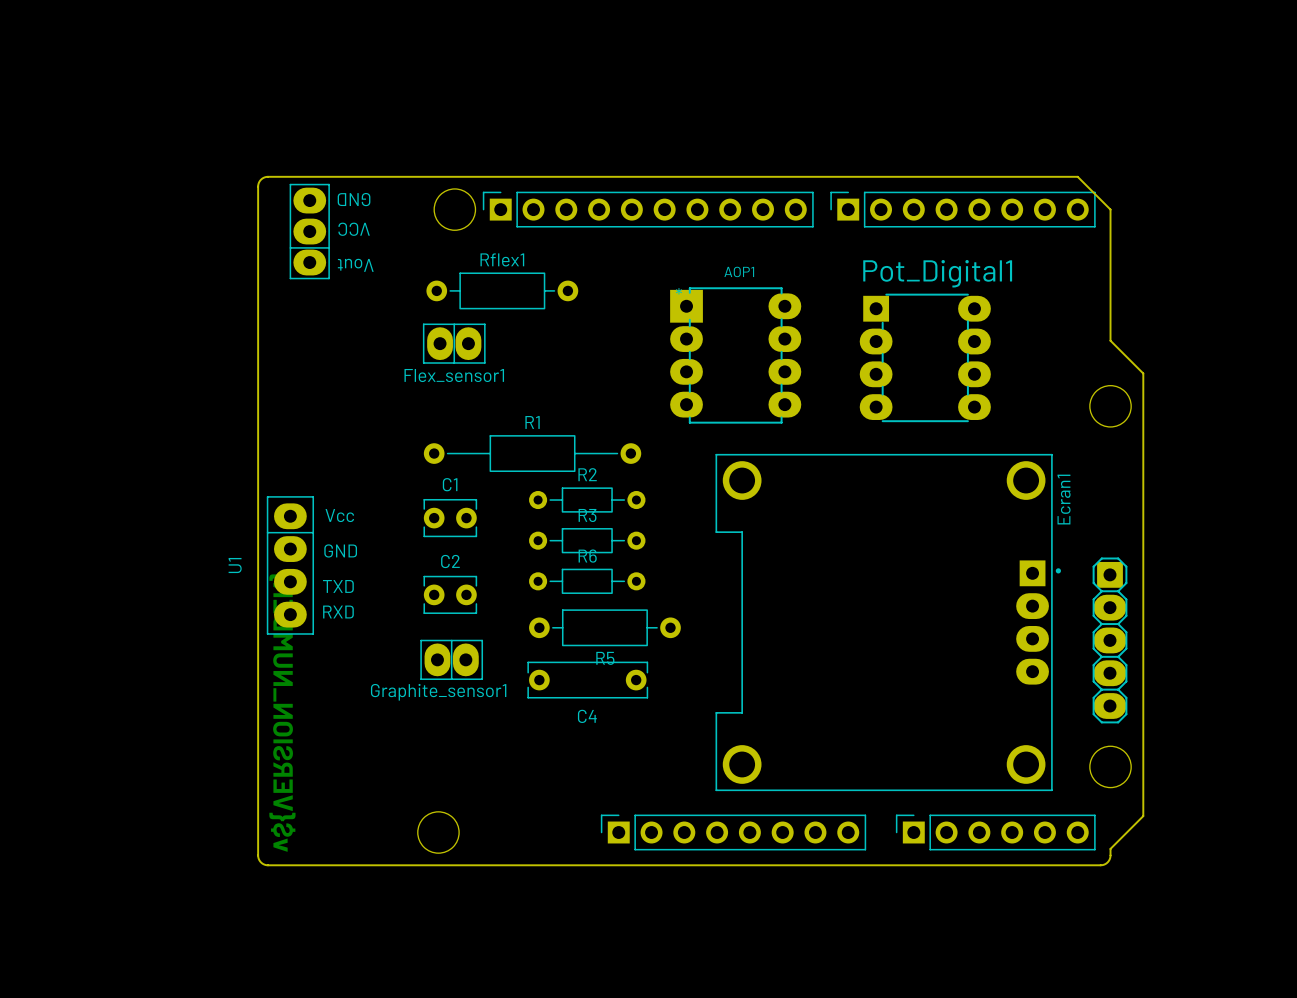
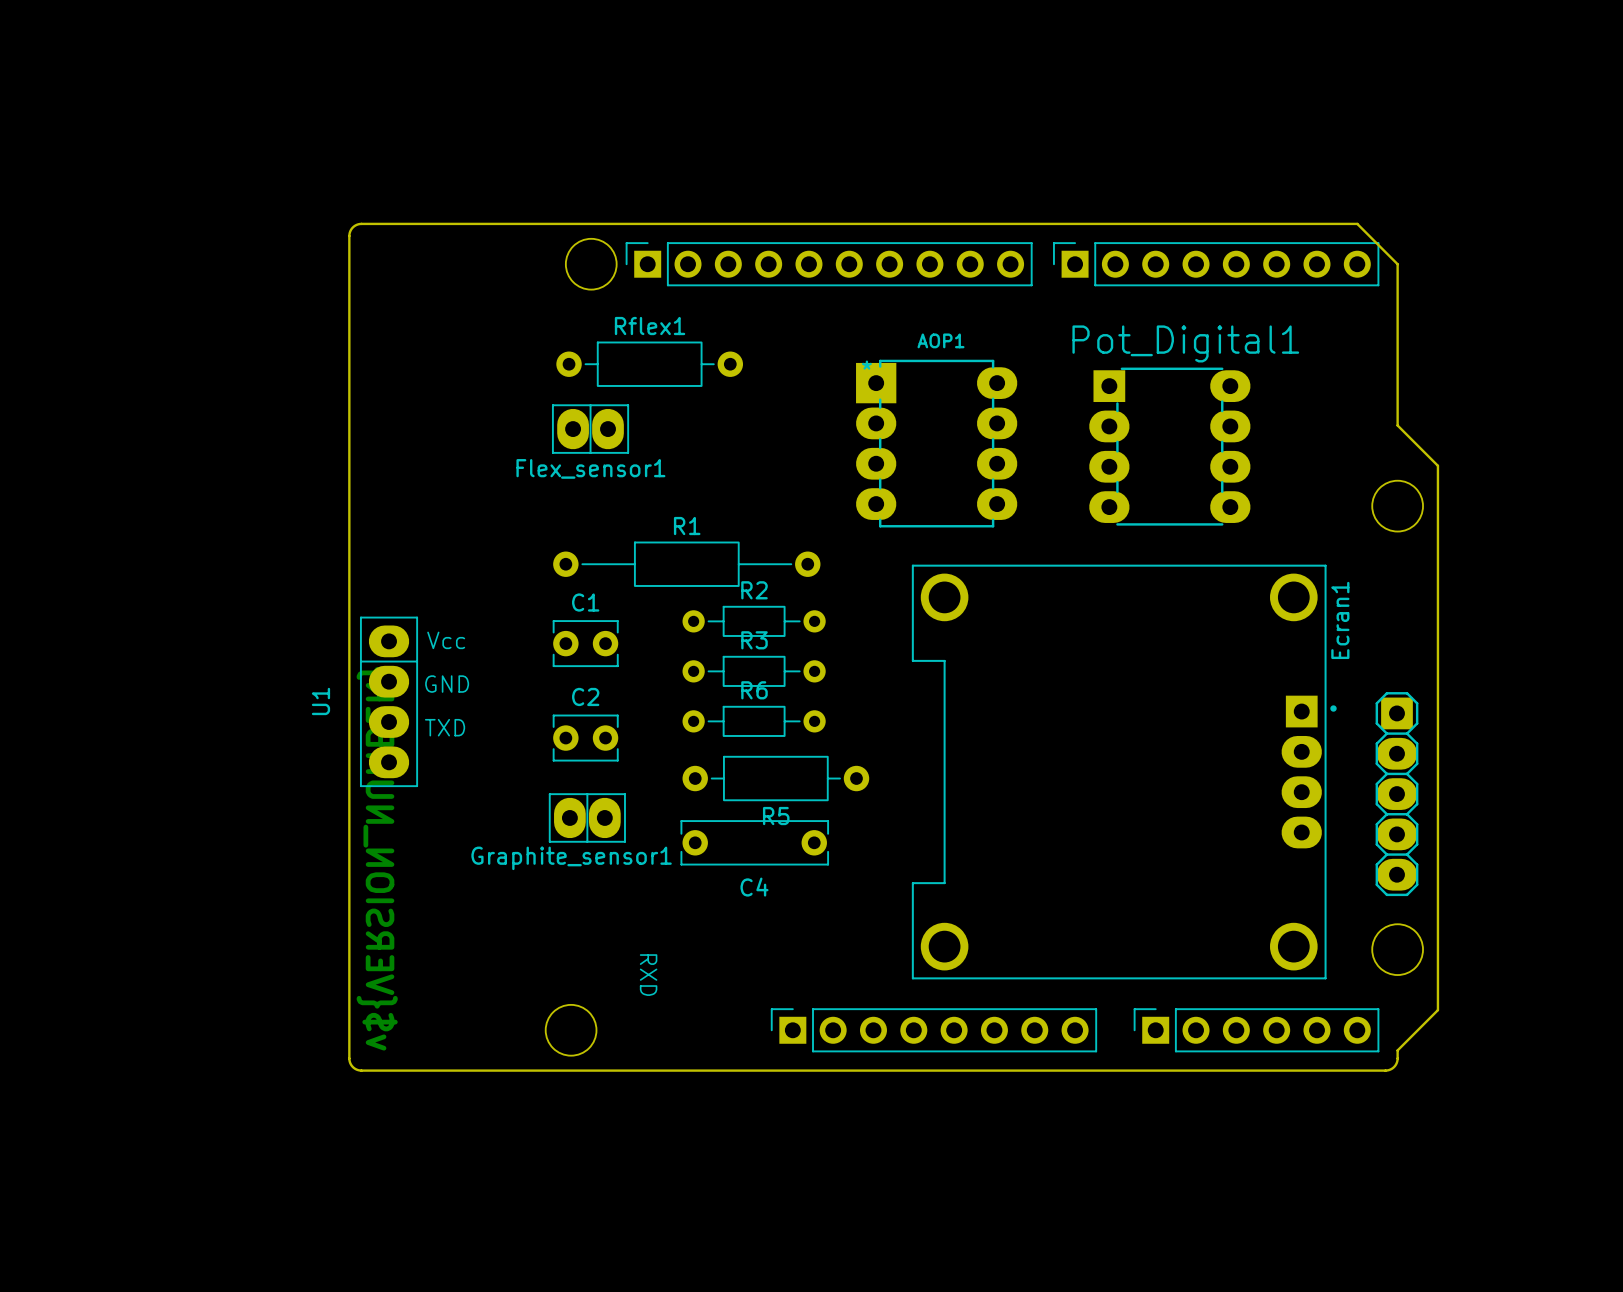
part: (309, 231) -> none
text rotation: 0° (338, 612) -> 90° clockwise (648, 975)
text position: RXD (338, 612) -> RXD (648, 975)

